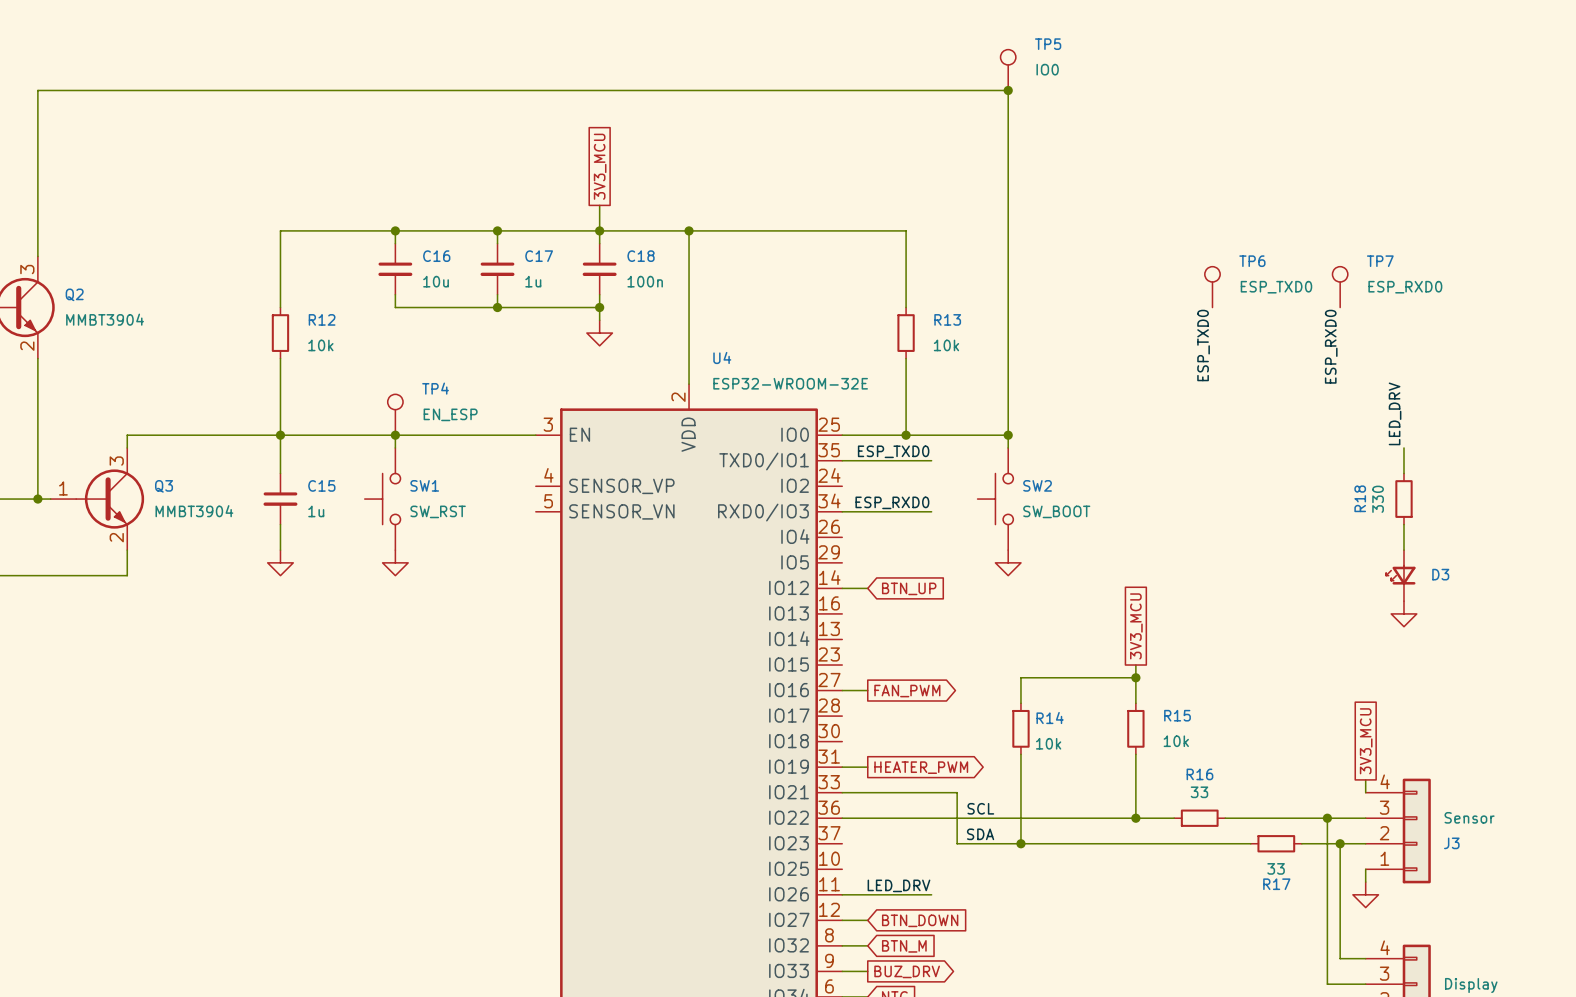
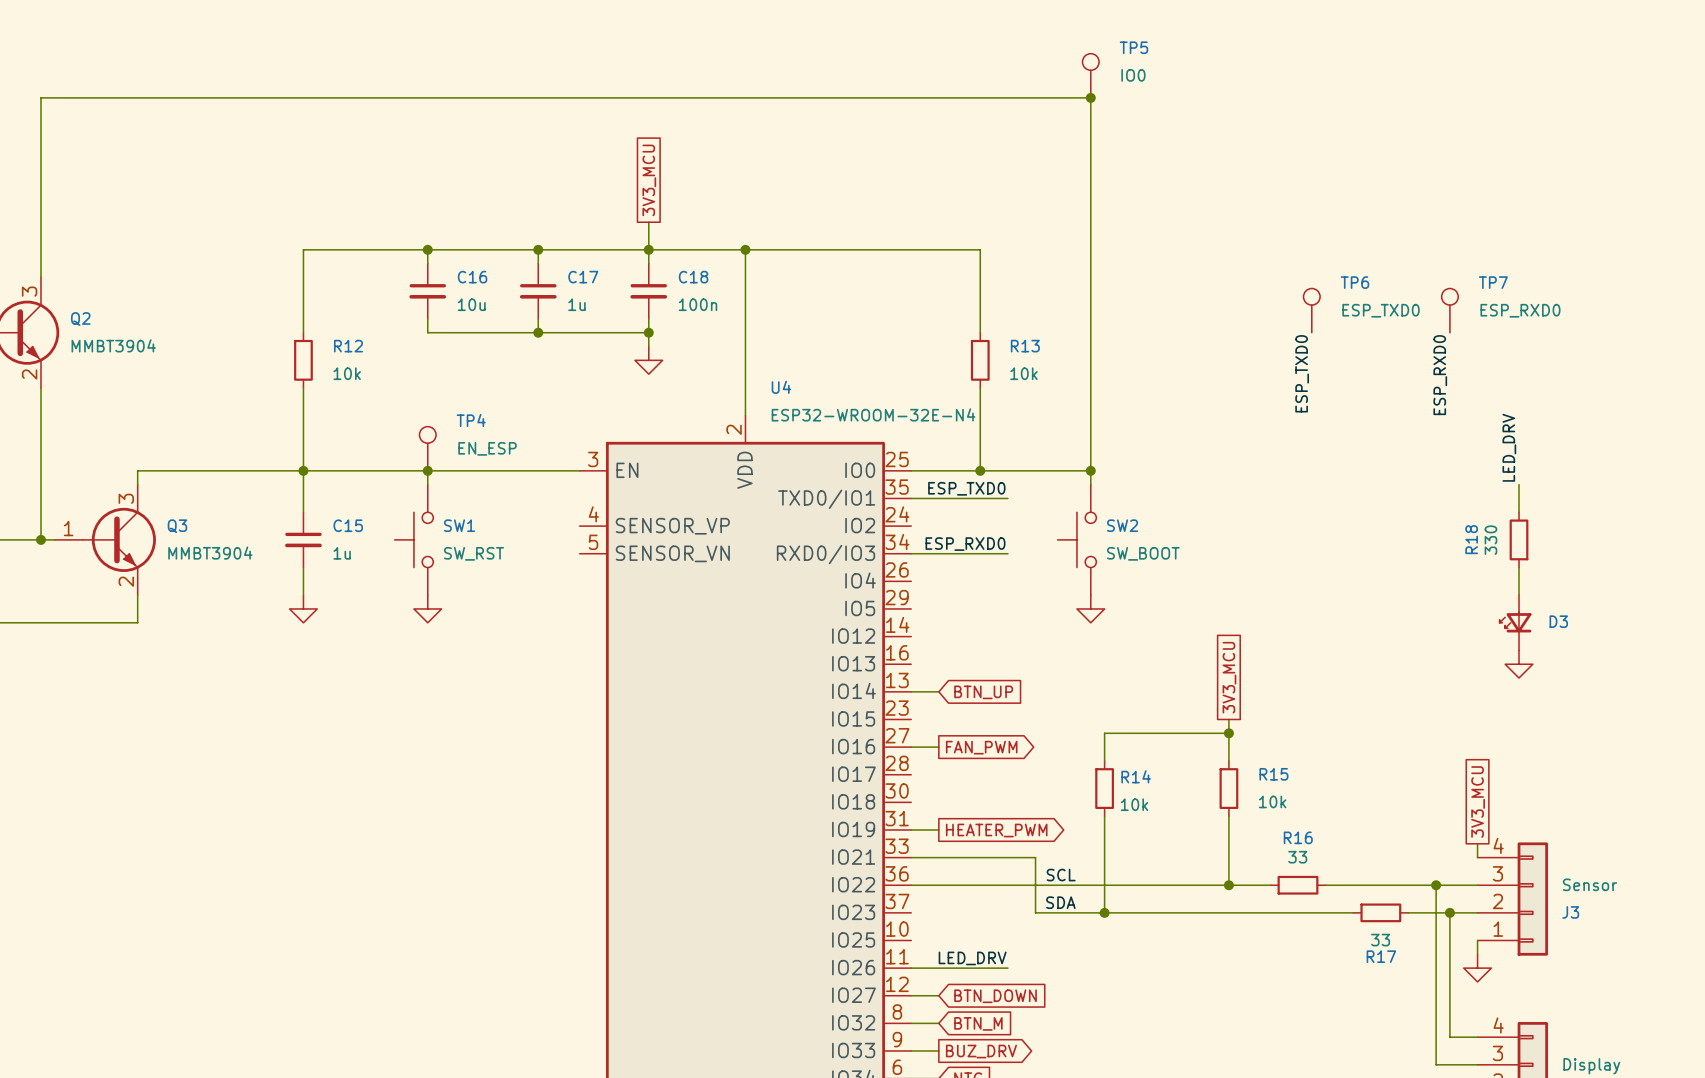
U4 value: ESP32-WROOM-32E (790, 383) -> ESP32-WROOM-32E-N4 (873, 414)
wire: (842, 588) (867, 588) -> (911, 691) (938, 691)
global label position: BTN_UP (909, 588) -> BTN_UP (983, 692)

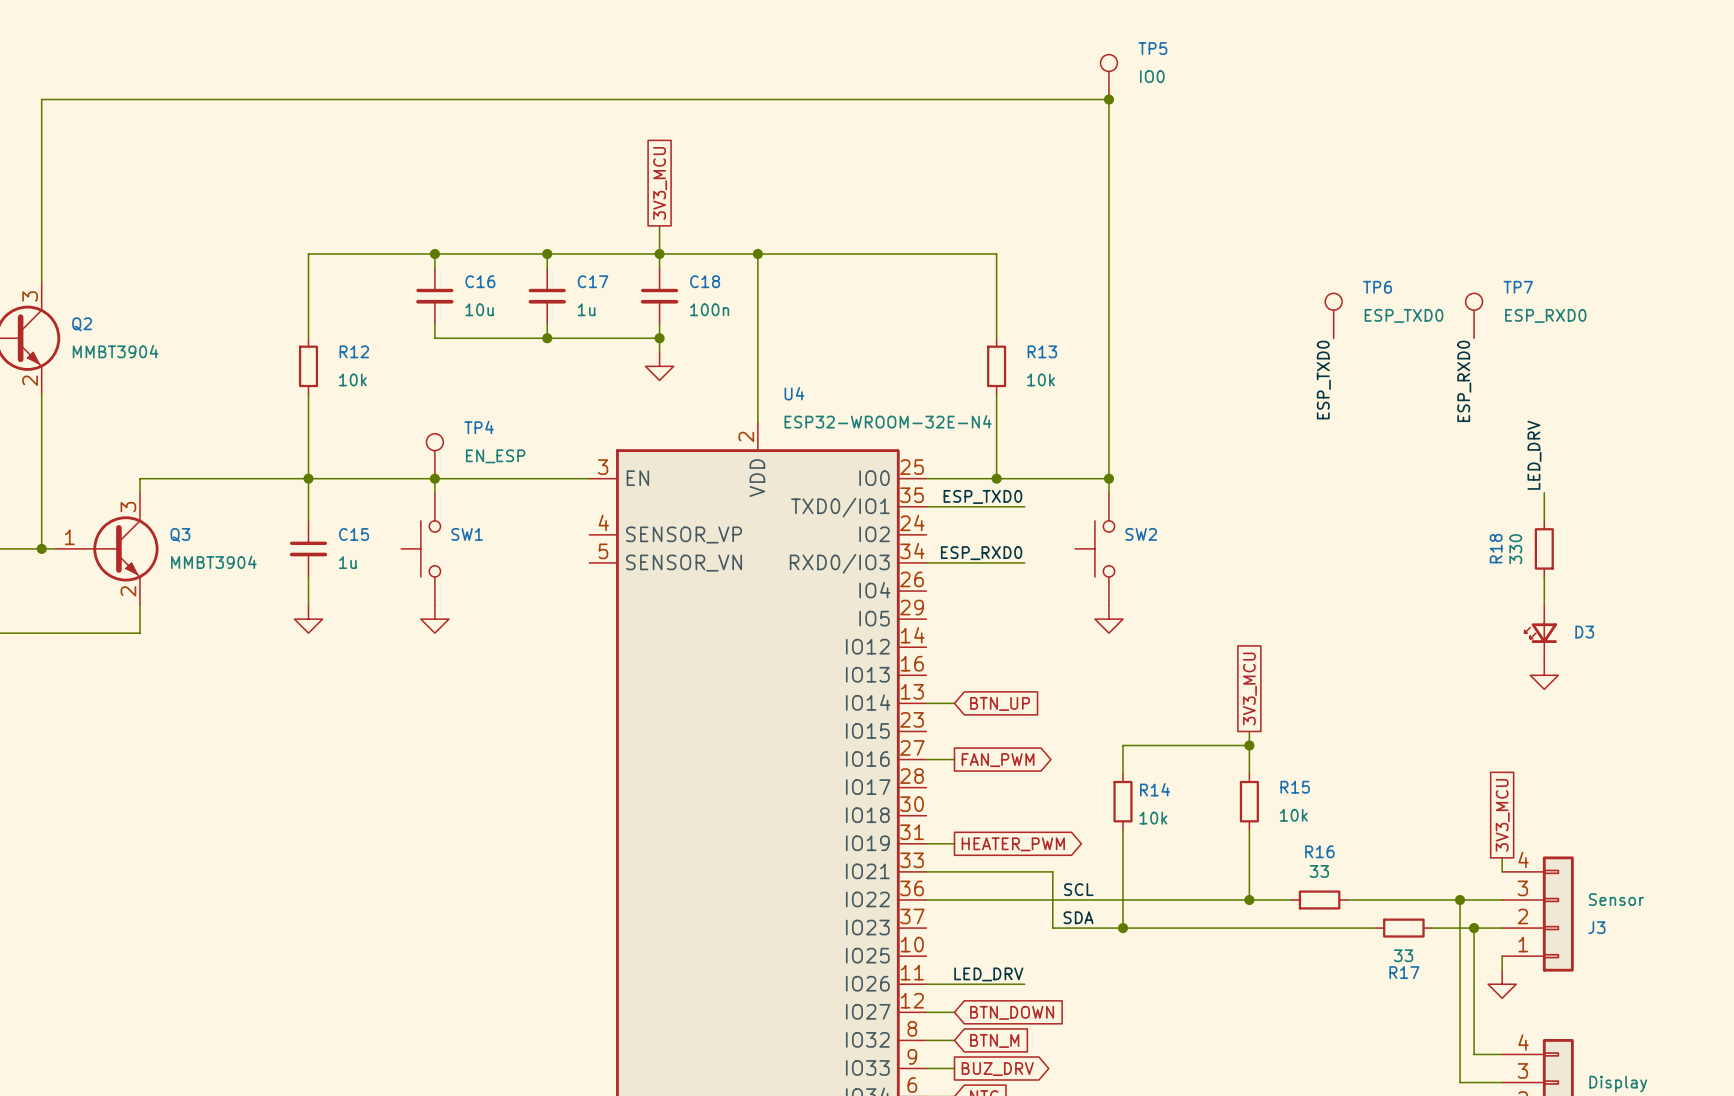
SW1 value: SW_RST (473, 553) -> none
SW2 value: SW_BOOT (1143, 553) -> none

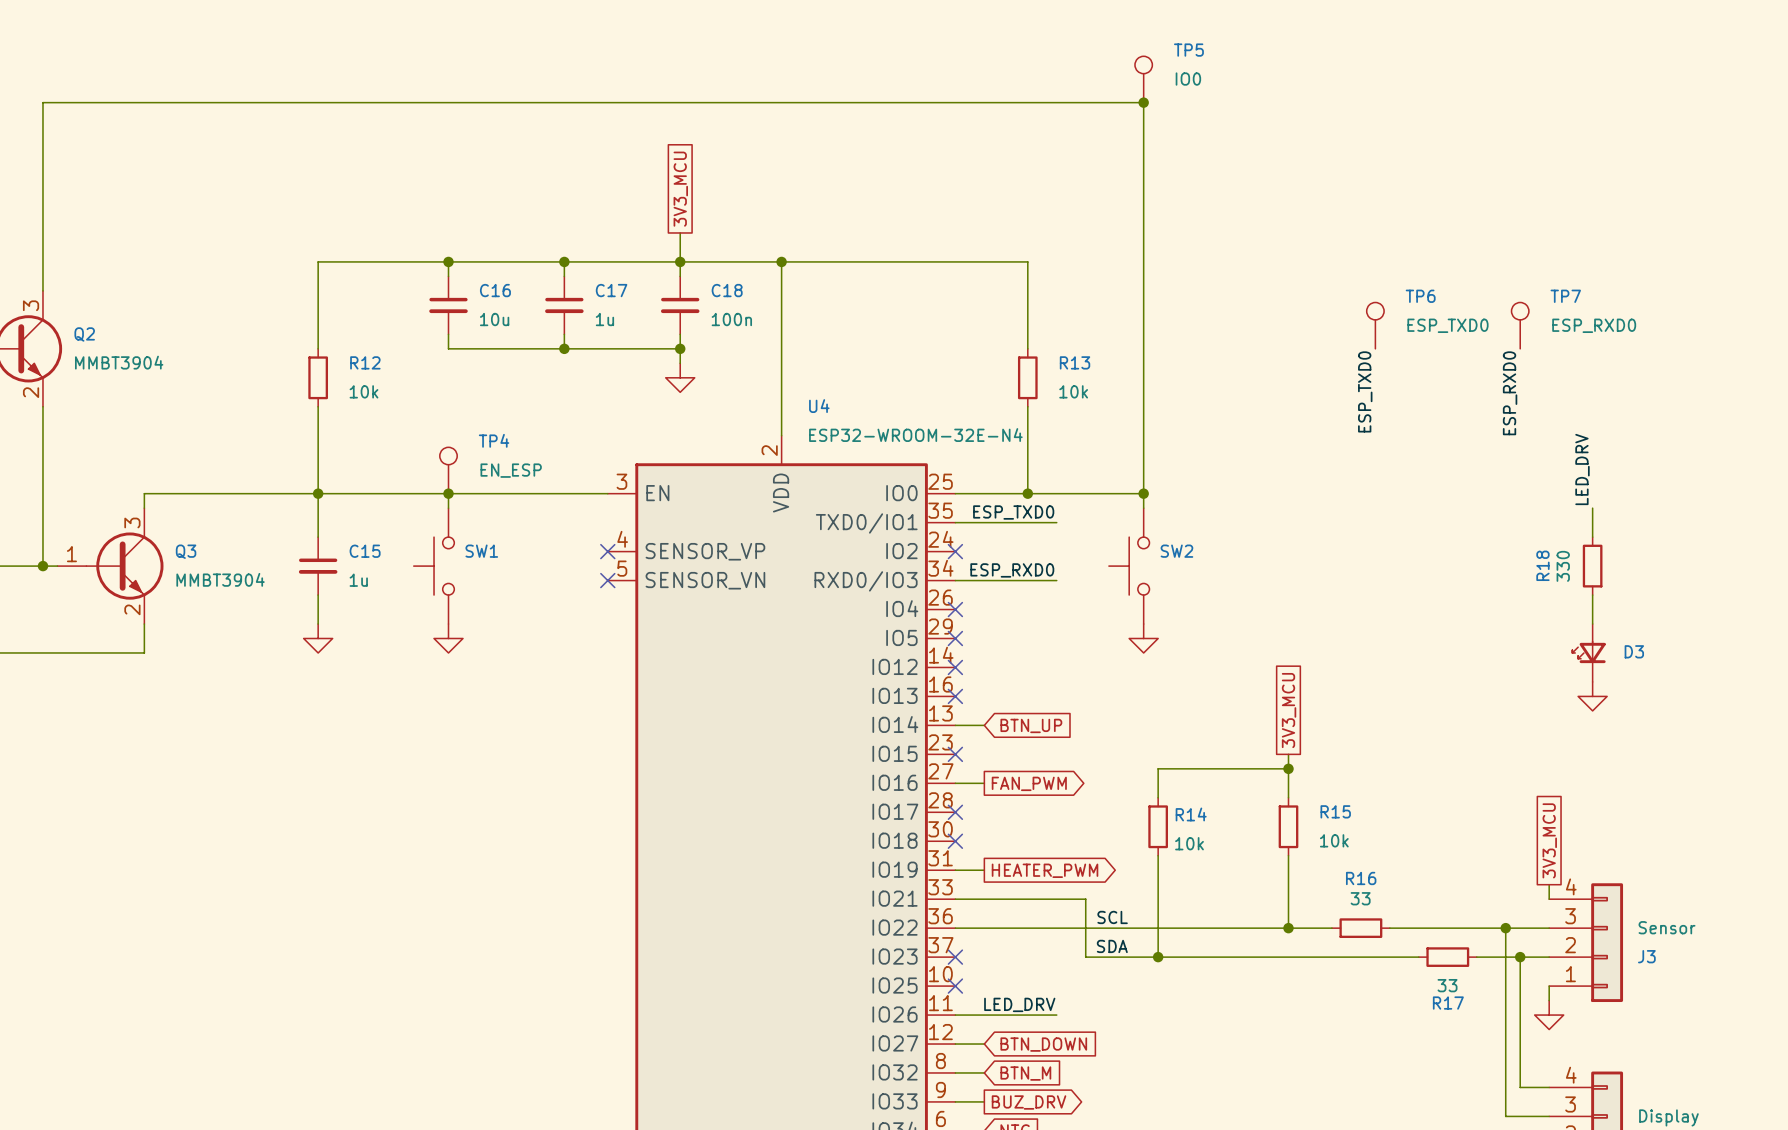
no-connect mark: none -> (607, 551)
no-connect mark: none -> (955, 551)
no-connect mark: none -> (607, 580)
no-connect mark: none -> (955, 609)
no-connect mark: none -> (955, 638)
no-connect mark: none -> (955, 667)
no-connect mark: none -> (955, 696)
no-connect mark: none -> (955, 754)
no-connect mark: none -> (955, 812)
no-connect mark: none -> (955, 841)
no-connect mark: none -> (955, 957)
no-connect mark: none -> (955, 986)

